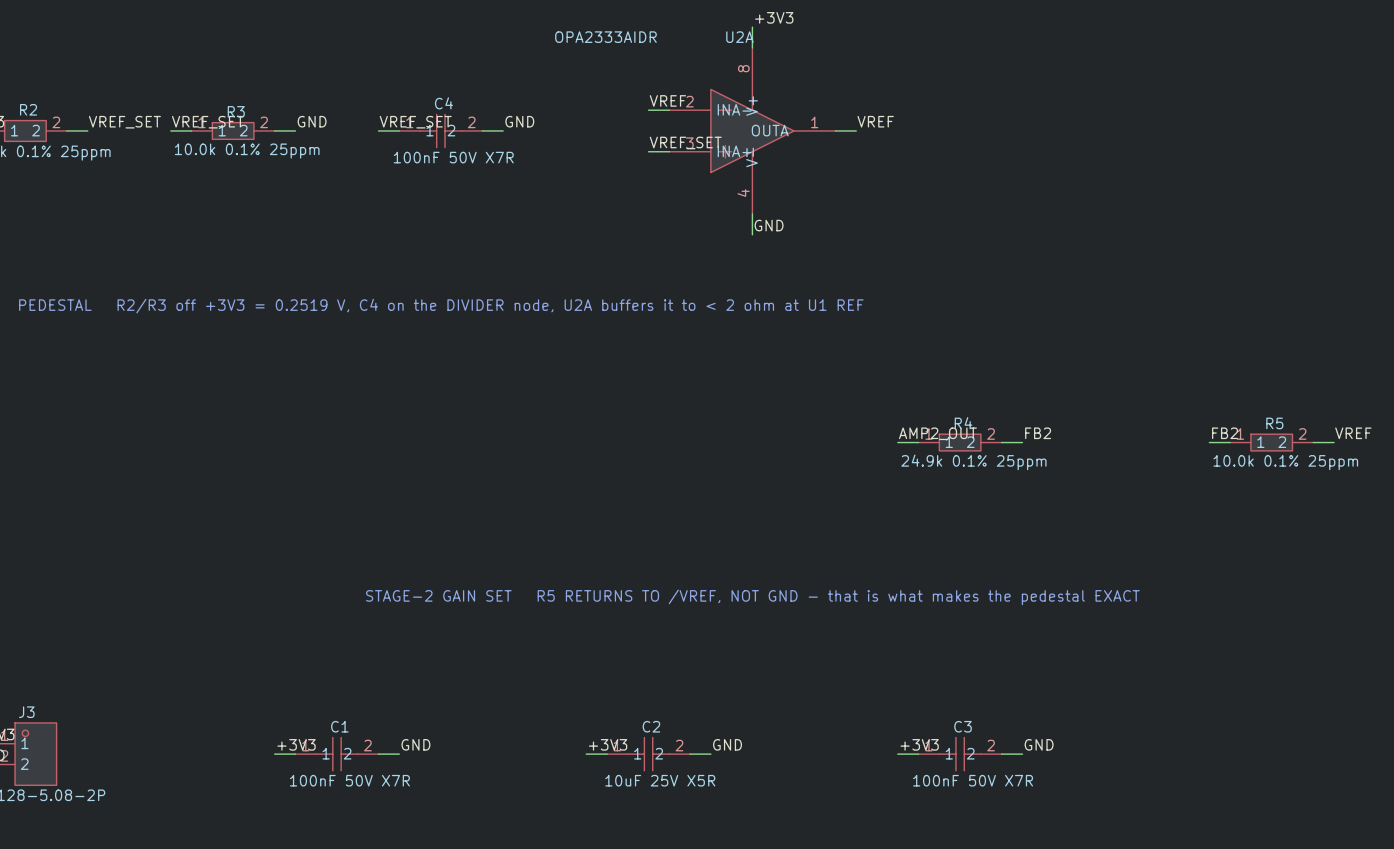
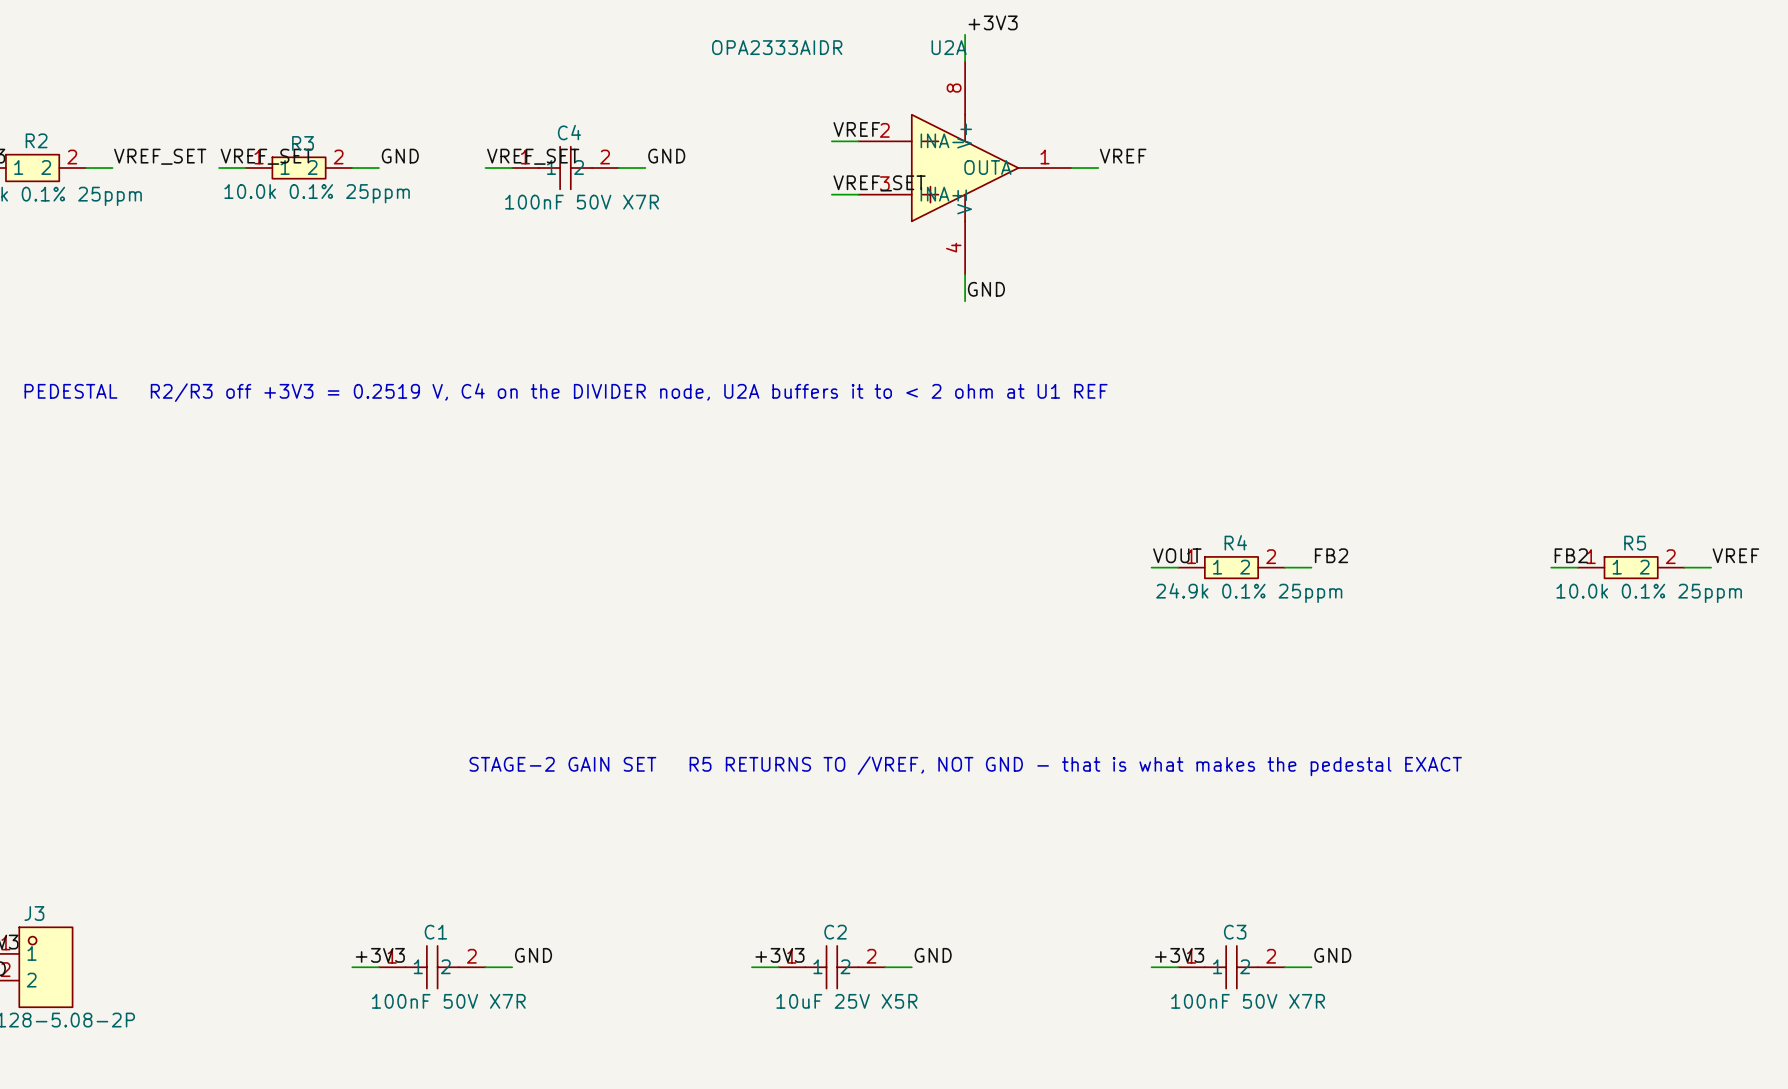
label: AMP2_OUT (937, 433) -> VOUT (1177, 555)

